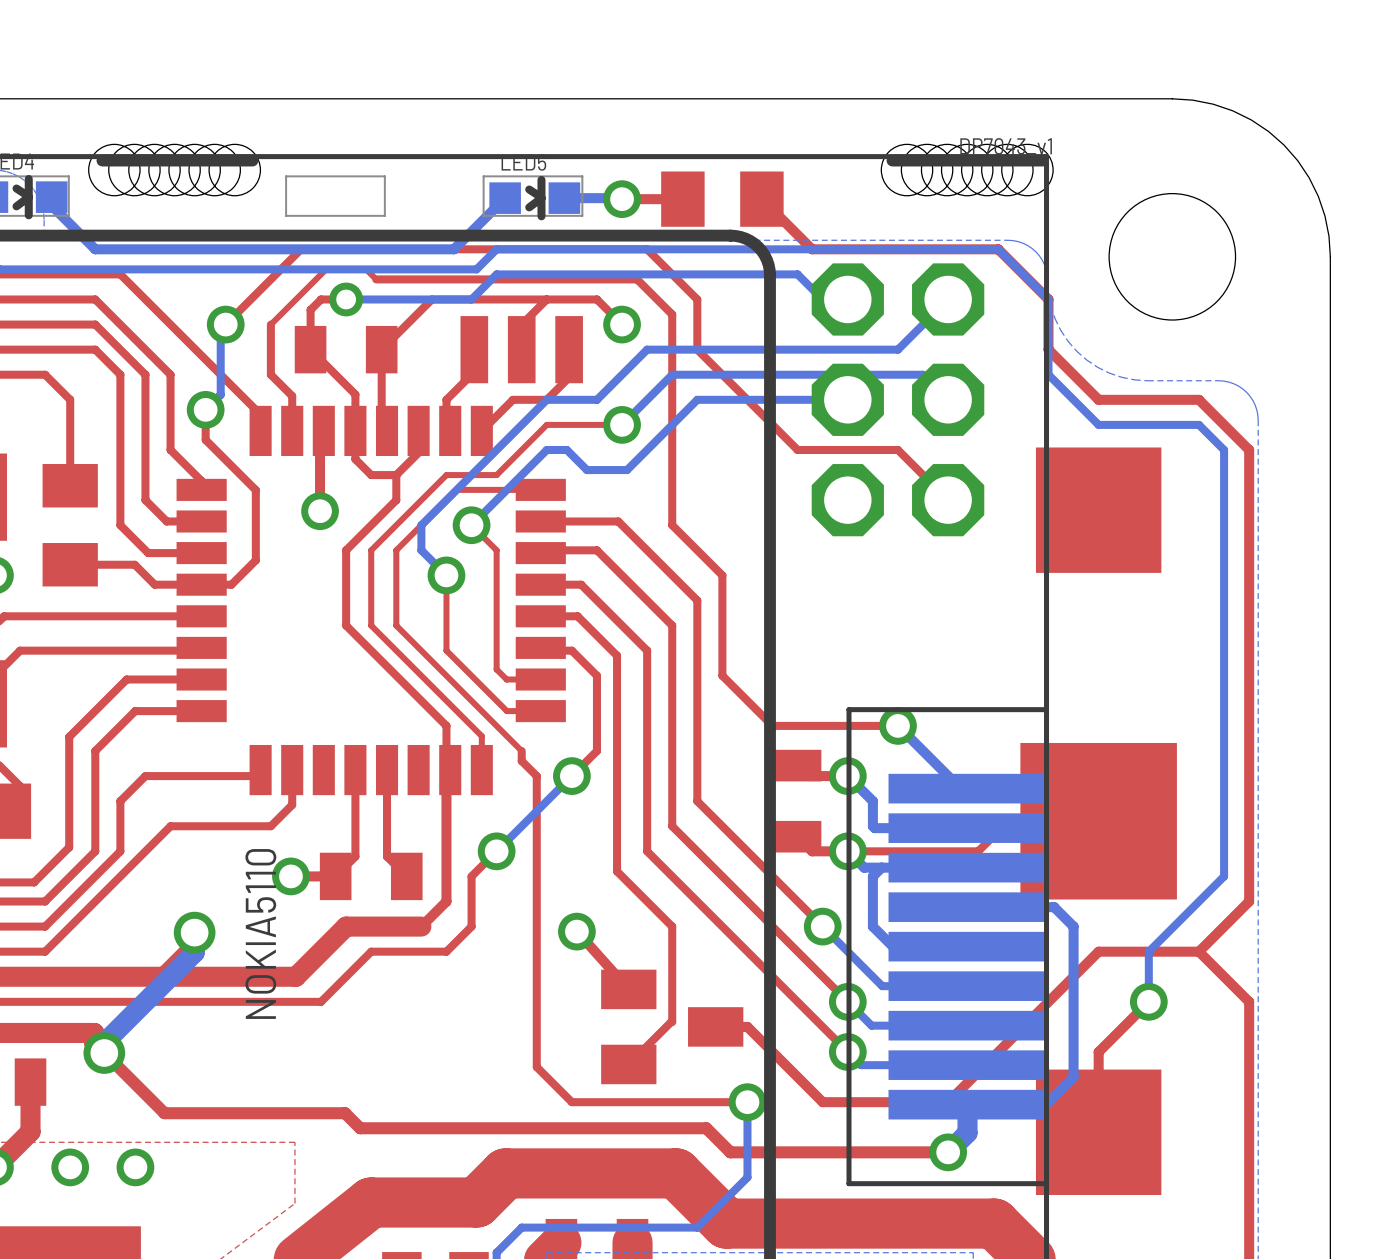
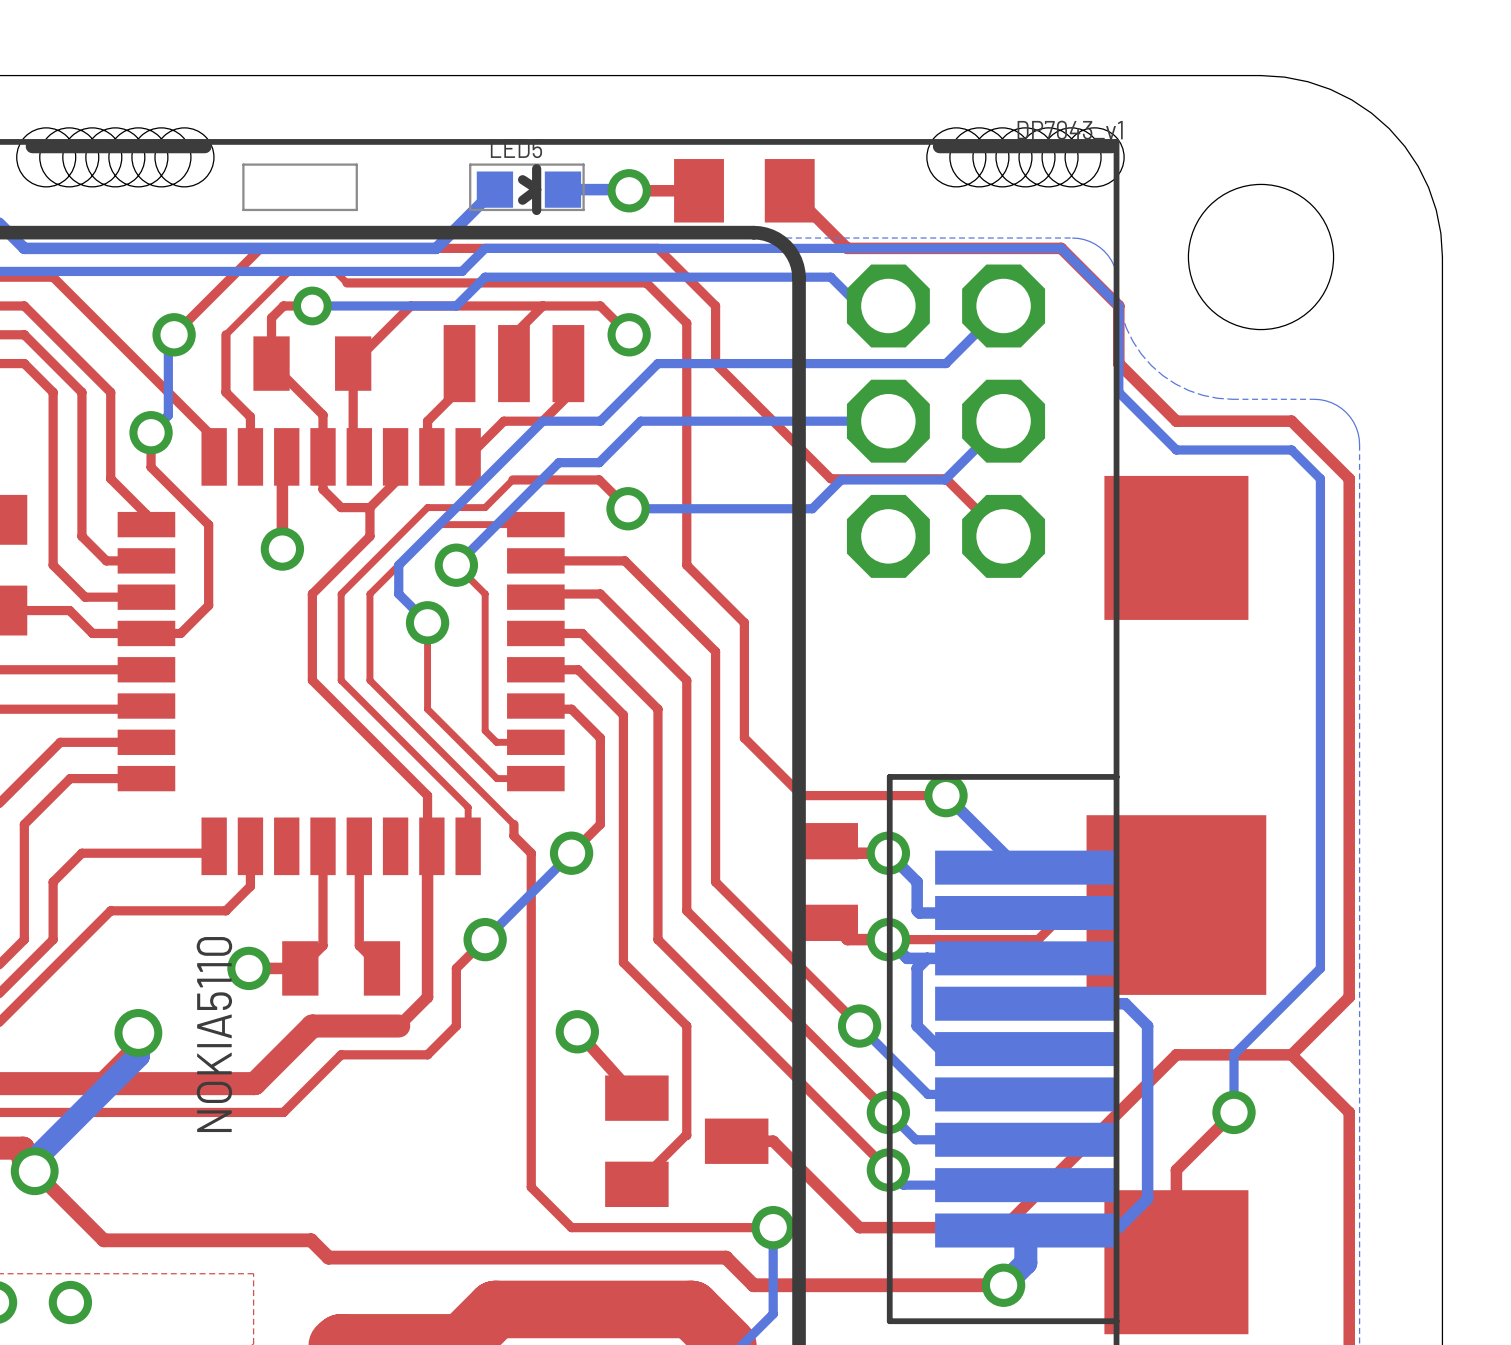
bottom track: (697, 399) (627, 470) (586, 470) (566, 449) (546, 449) -> (715, 421) (640, 421) (599, 462) (558, 462) (542, 478)
bottom track: (948, 399) (923, 374) (672, 374) (622, 424) -> (1003, 421) (944, 479) (841, 479) (812, 508) (628, 508)
top track: (622, 424) (546, 424) (520, 450) -> (628, 508) (599, 479) (512, 479)
via position: (622, 424) -> (628, 508)

